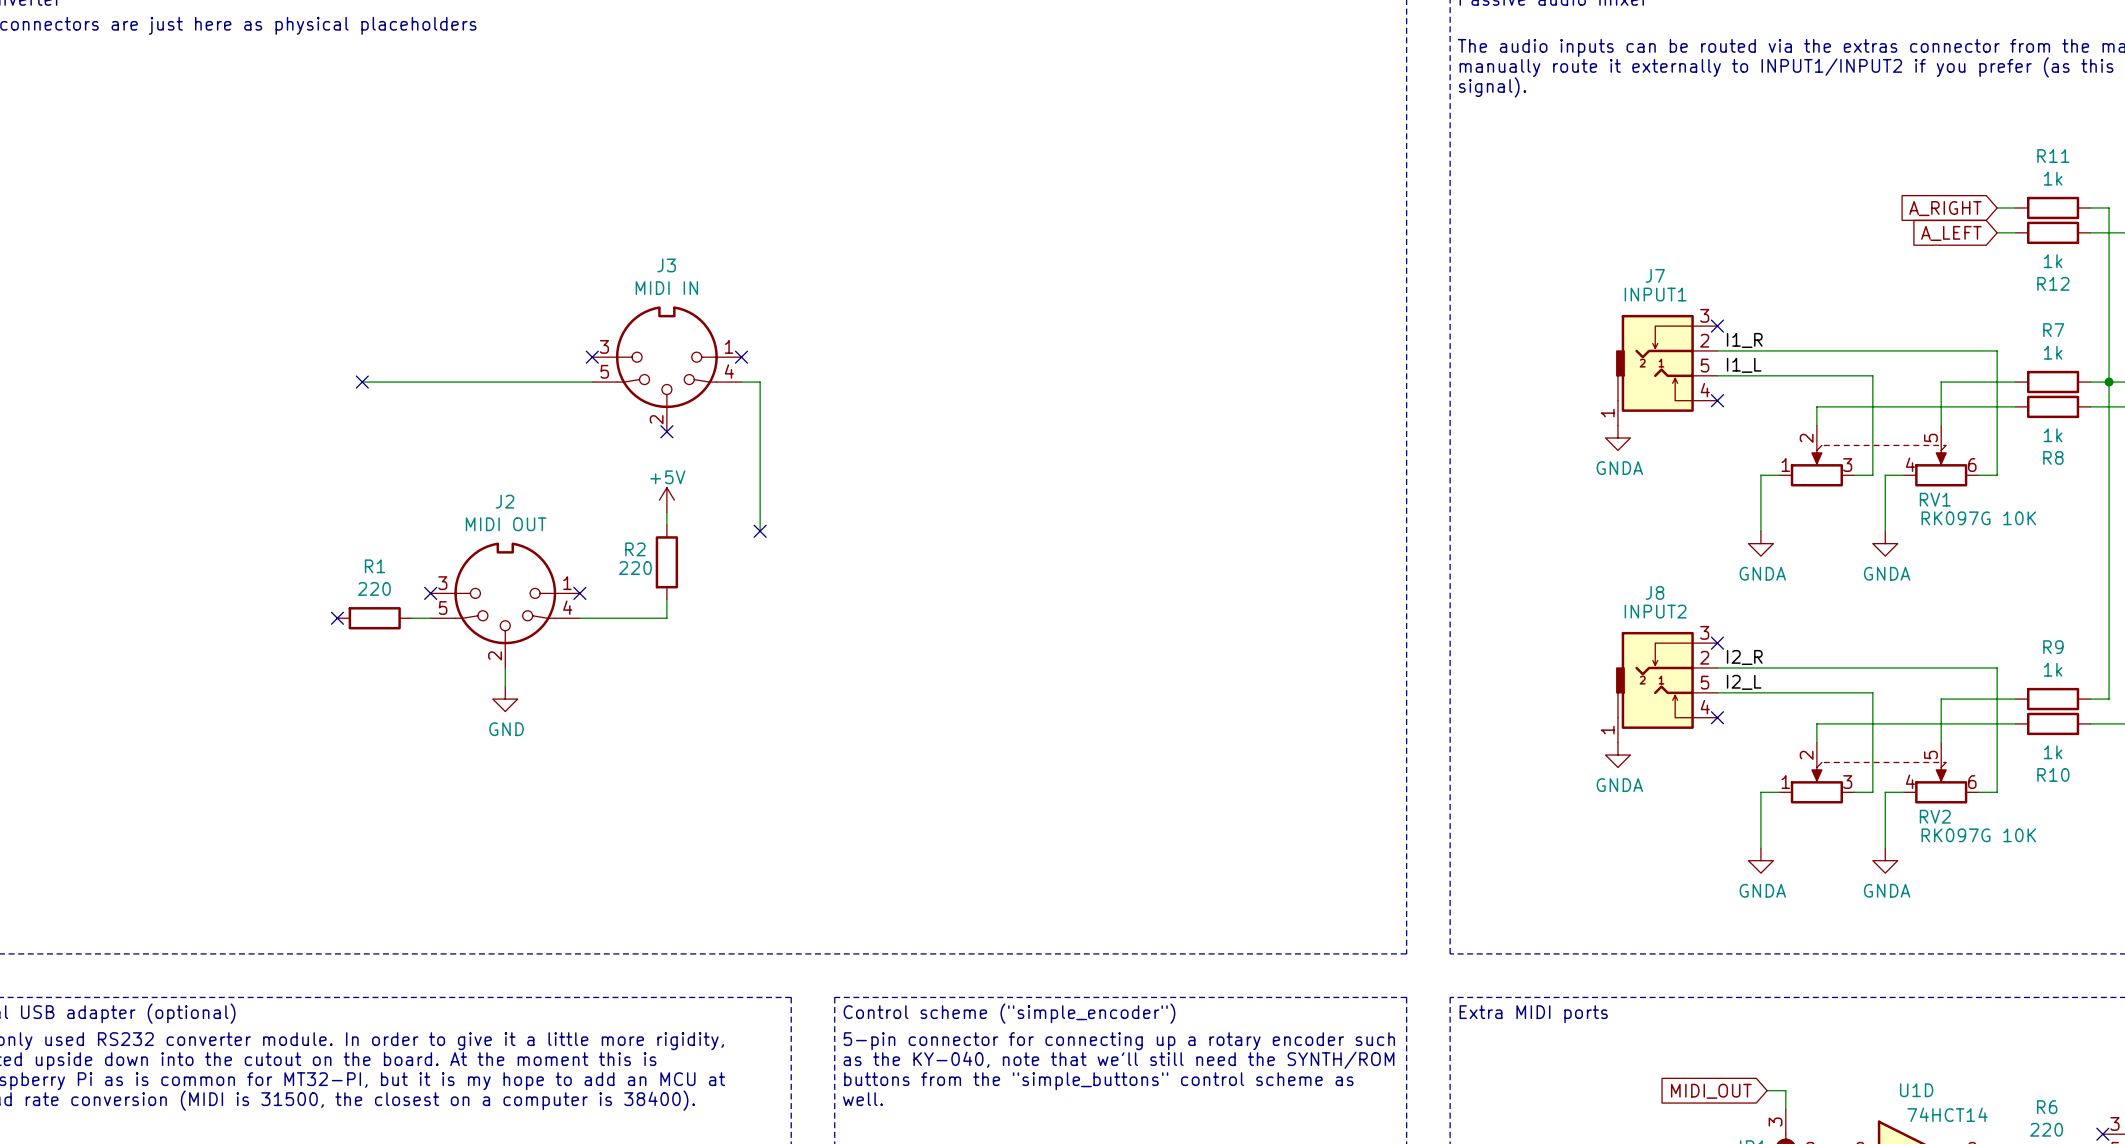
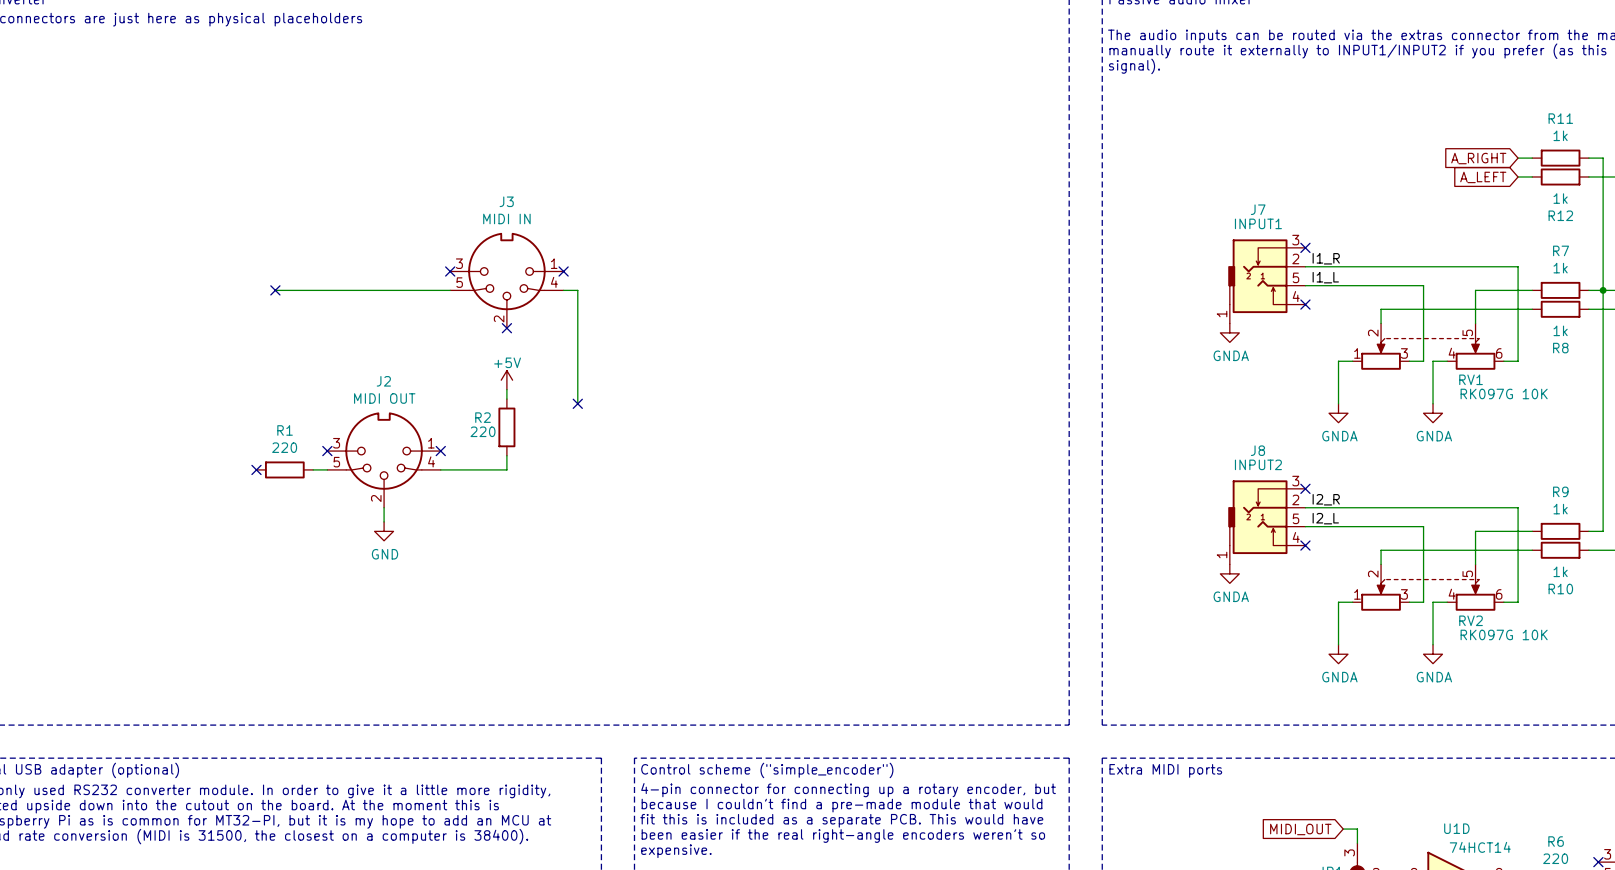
text: 5-pin connector for connecting up a rotary encoder such (1119, 1041) -> 4-pin connector for connecting up a rotary encoder, but (848, 790)
text: as the KY-040, note that we'll still need the SYNTH/ROM (1118, 1060) -> because I couldn't find a pre-made module that would (842, 805)
text: buttons from the "simple_buttons" control scheme as (1098, 1081) -> fit this is included as a separate PCB. This would have (841, 820)
text: well. (862, 1099) -> been easier if the real right-angle encoders weren't so (843, 836)
text: none -> expensive. (676, 851)

